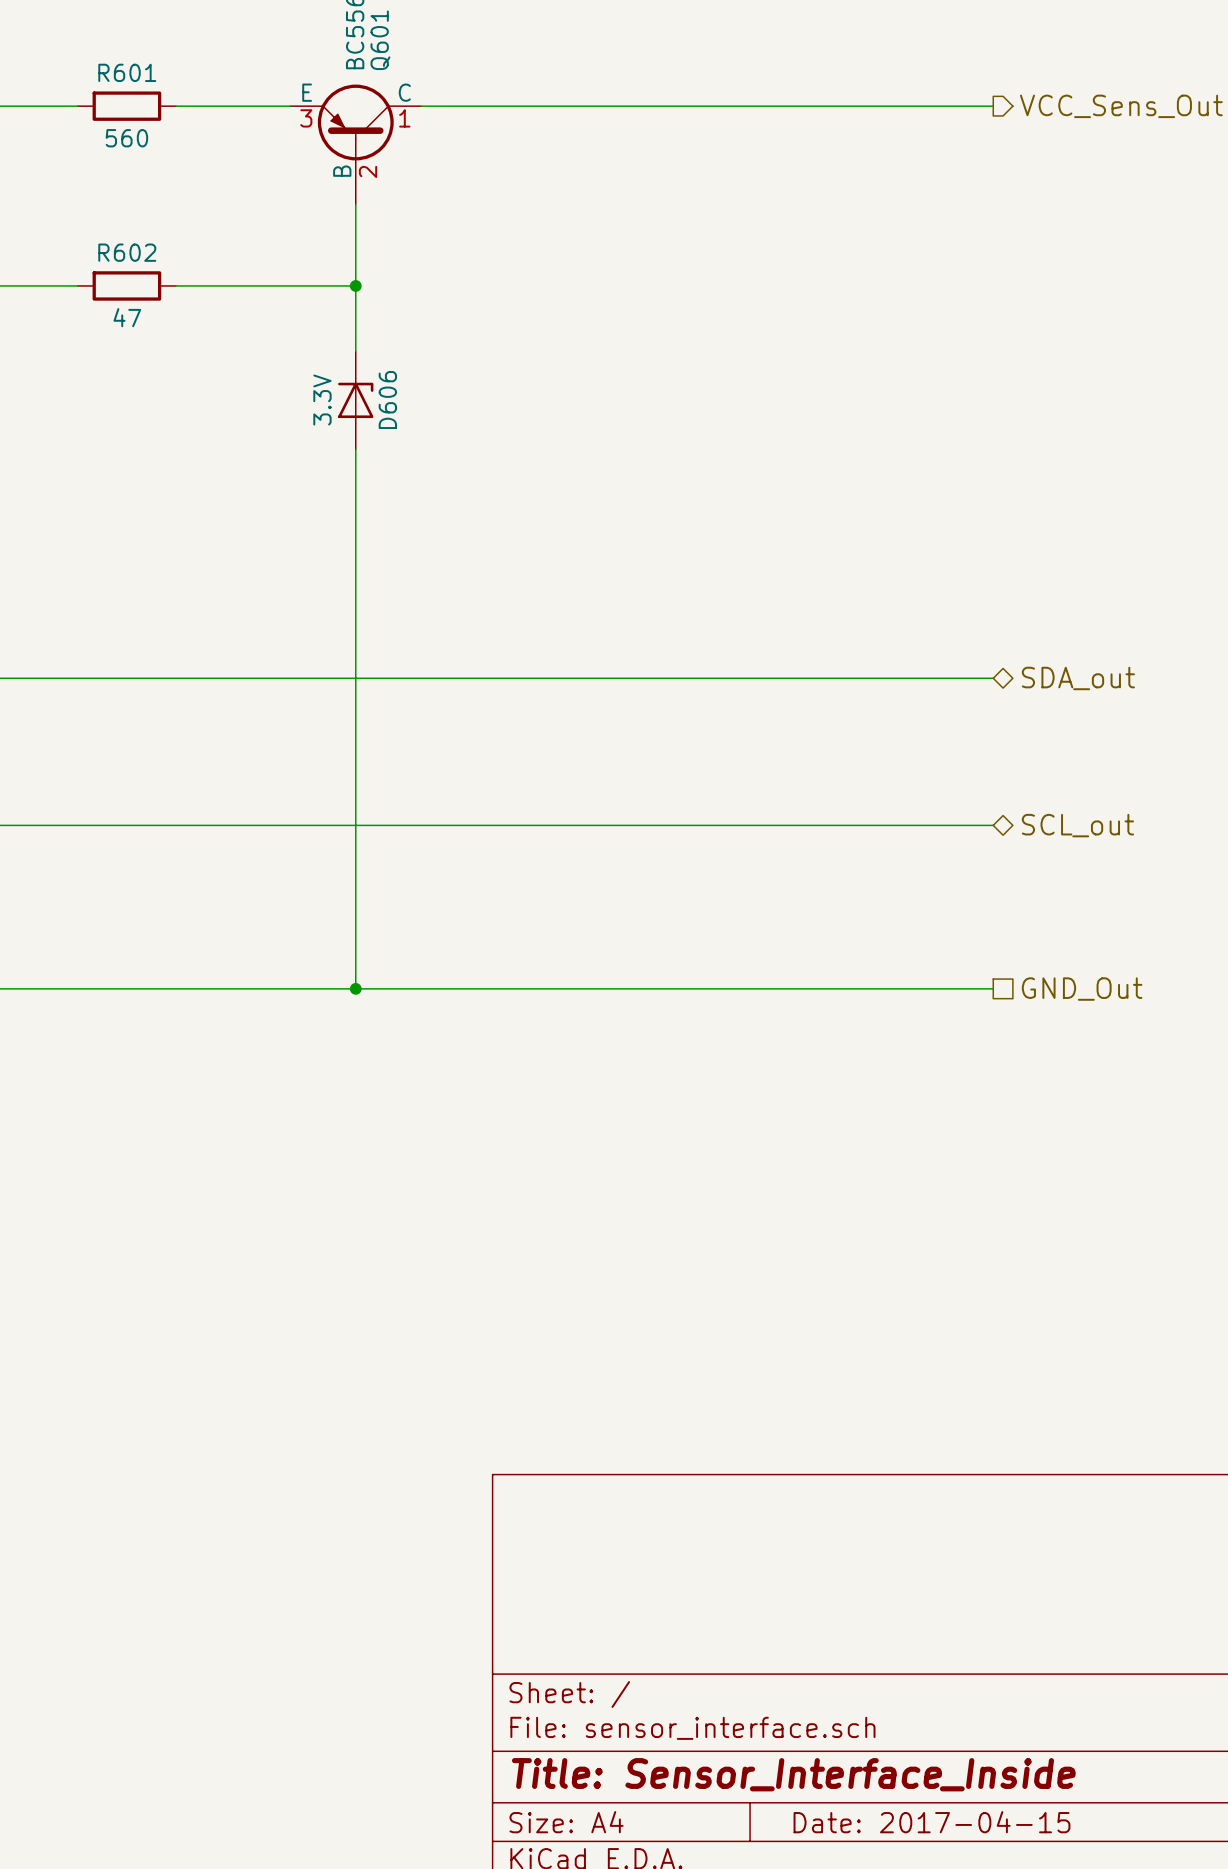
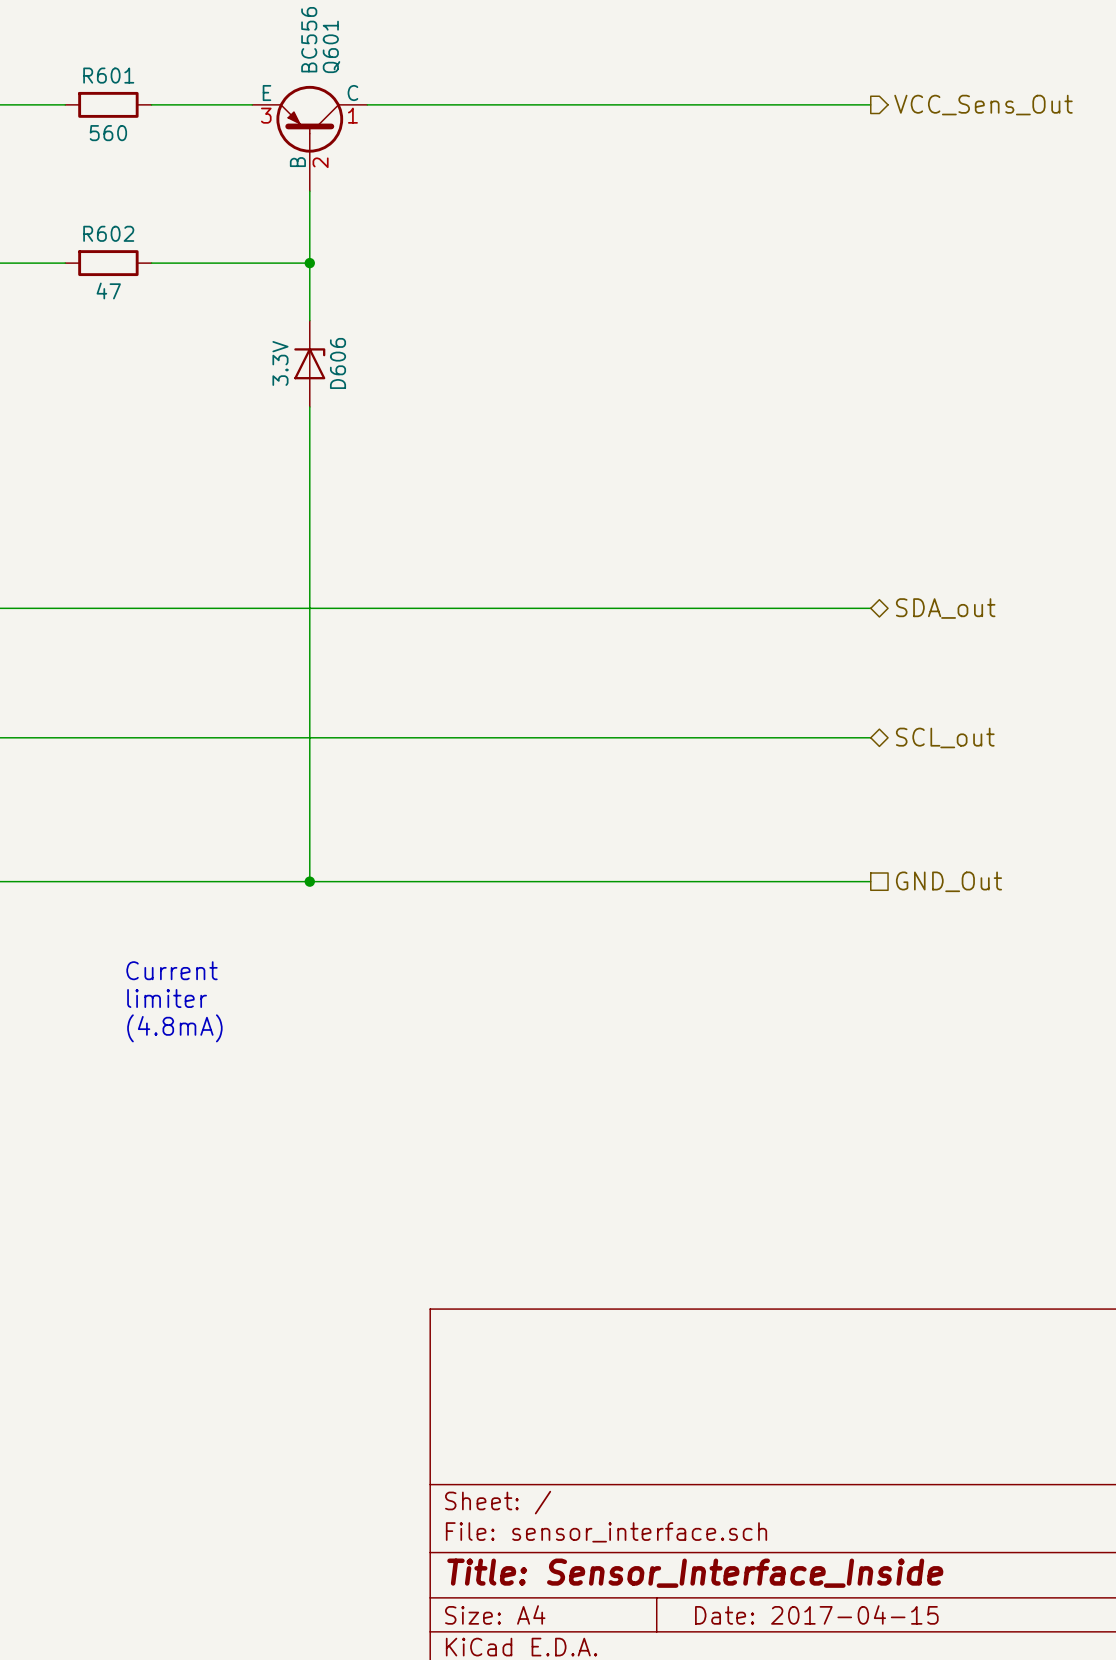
text: none -> Current (172, 970)
text: none -> limiter (167, 998)
text: none -> (4.8mA) (174, 1028)

